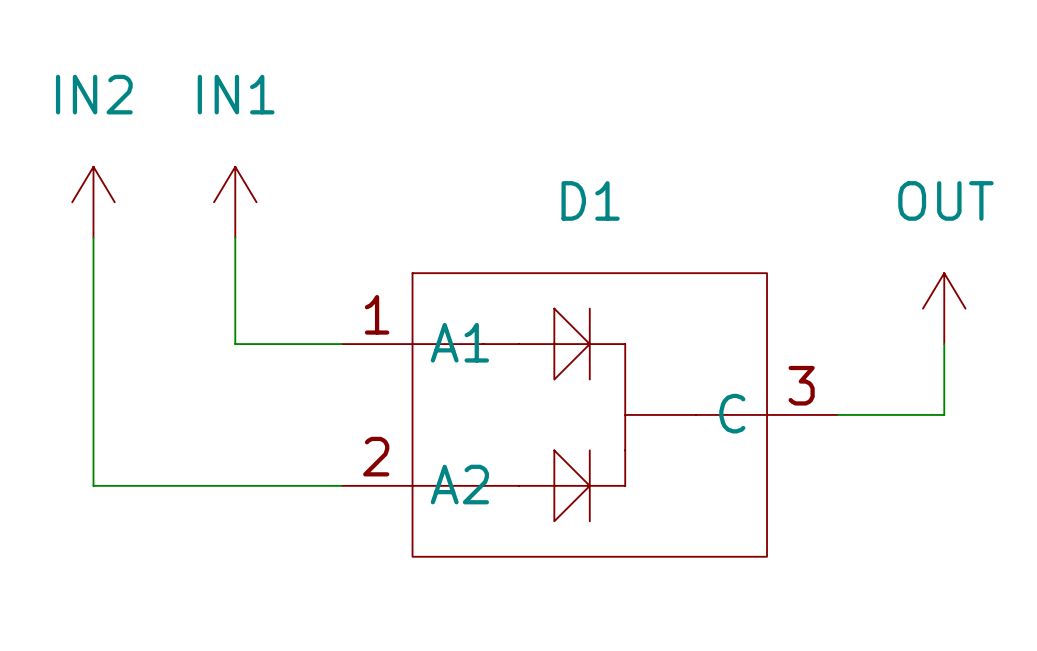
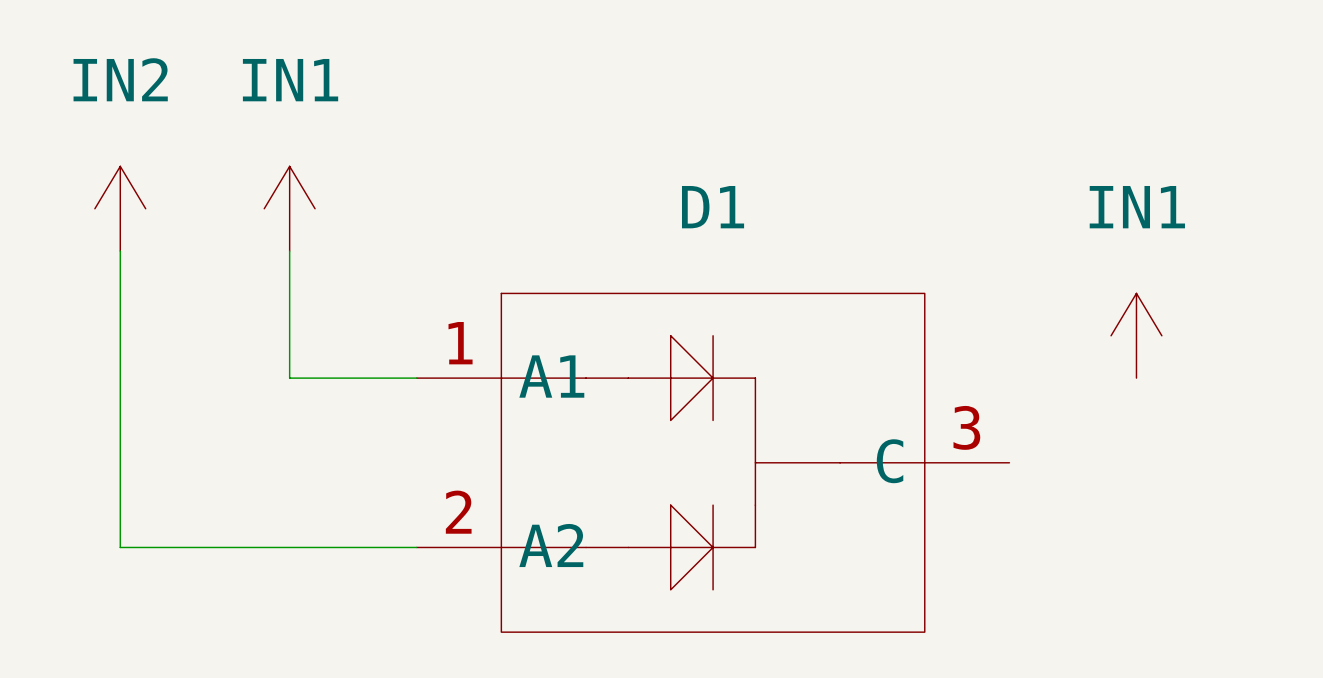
power symbol: OUT (944, 308) -> IN1 (1136, 335)
wire: (944, 344) (944, 414) (837, 414) -> none

